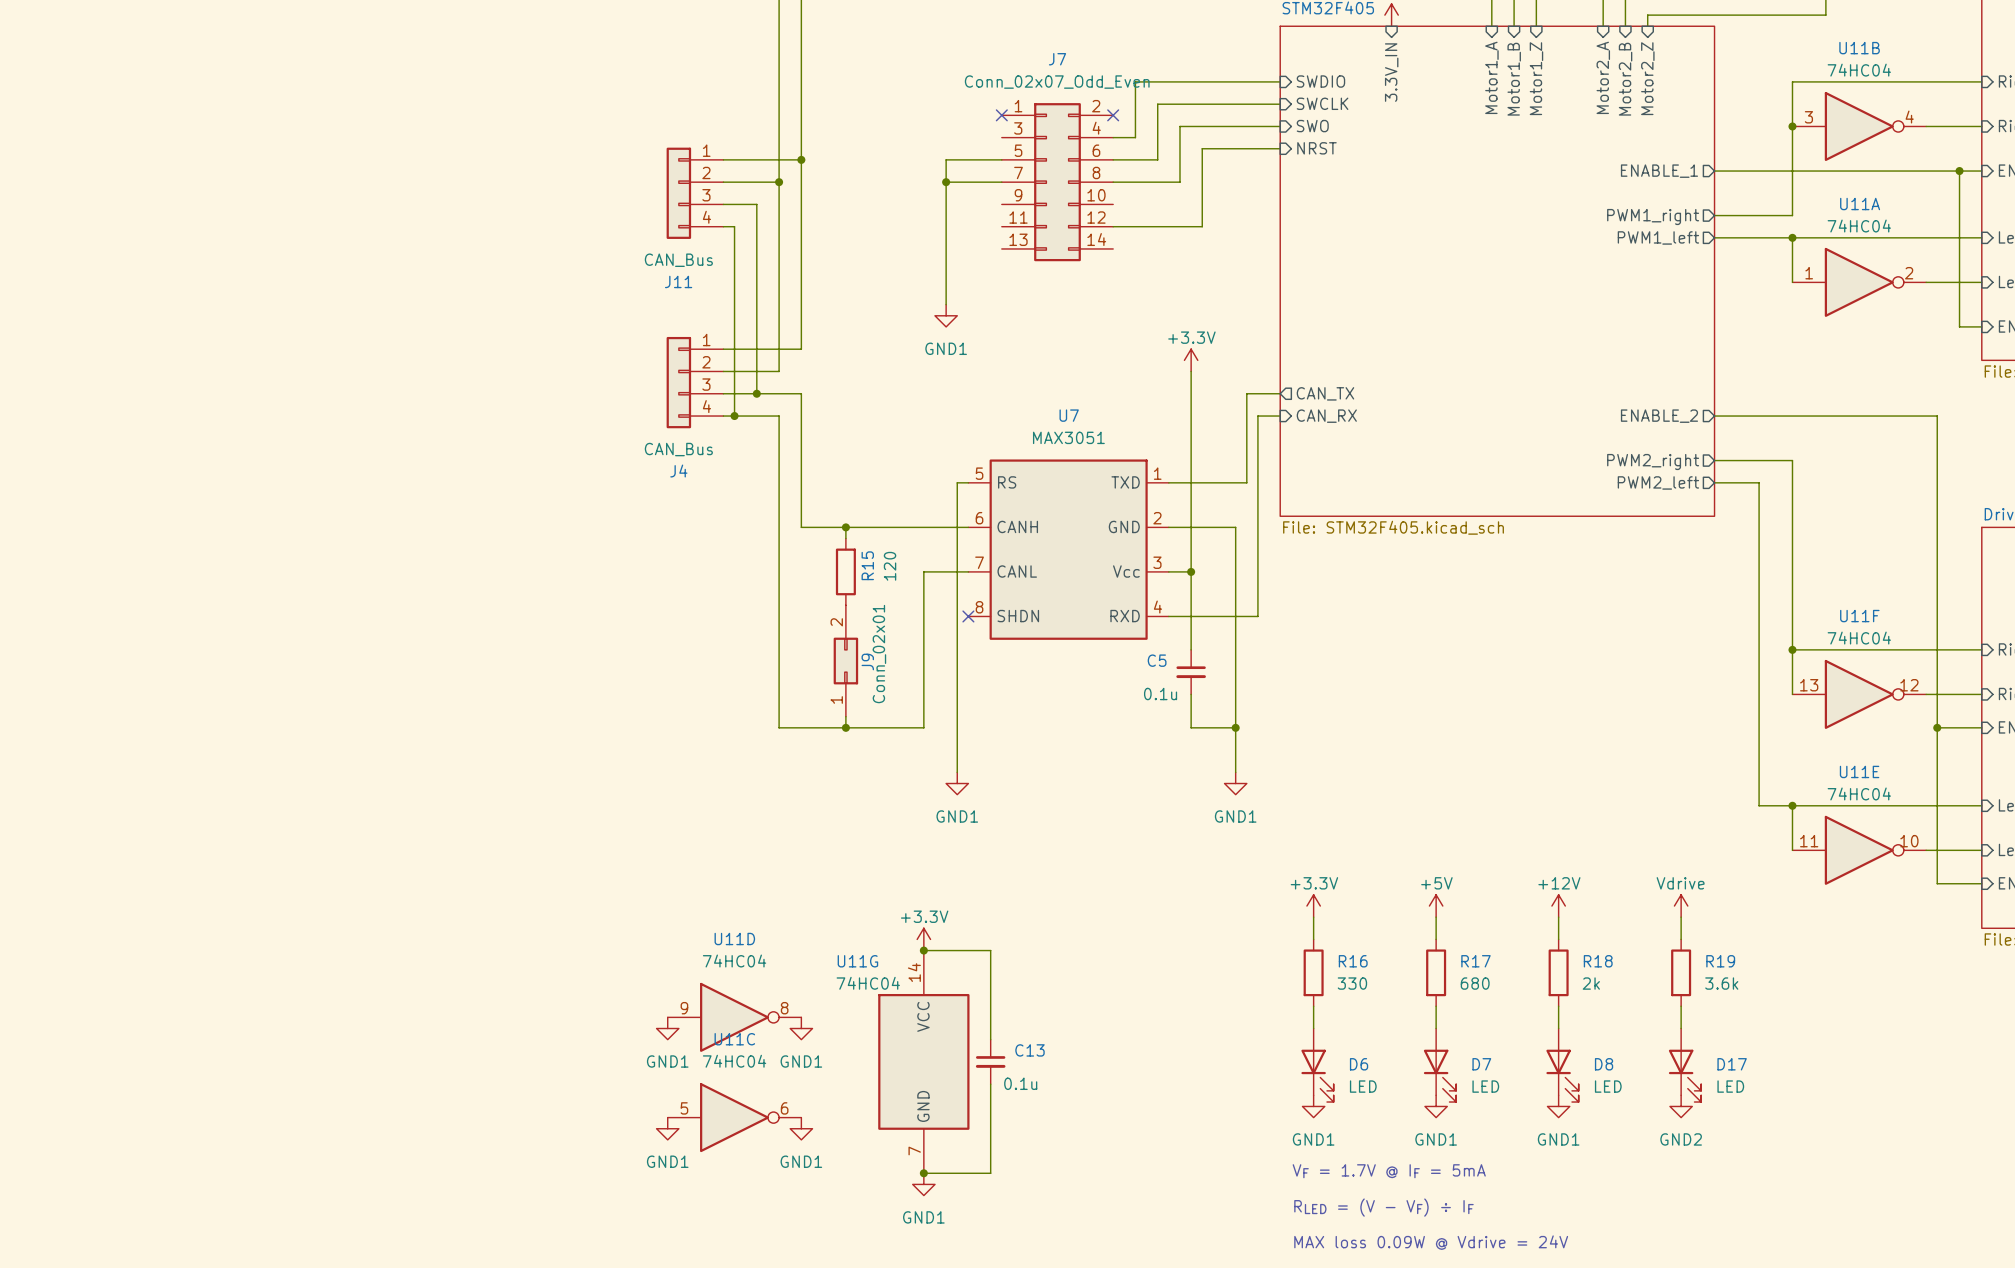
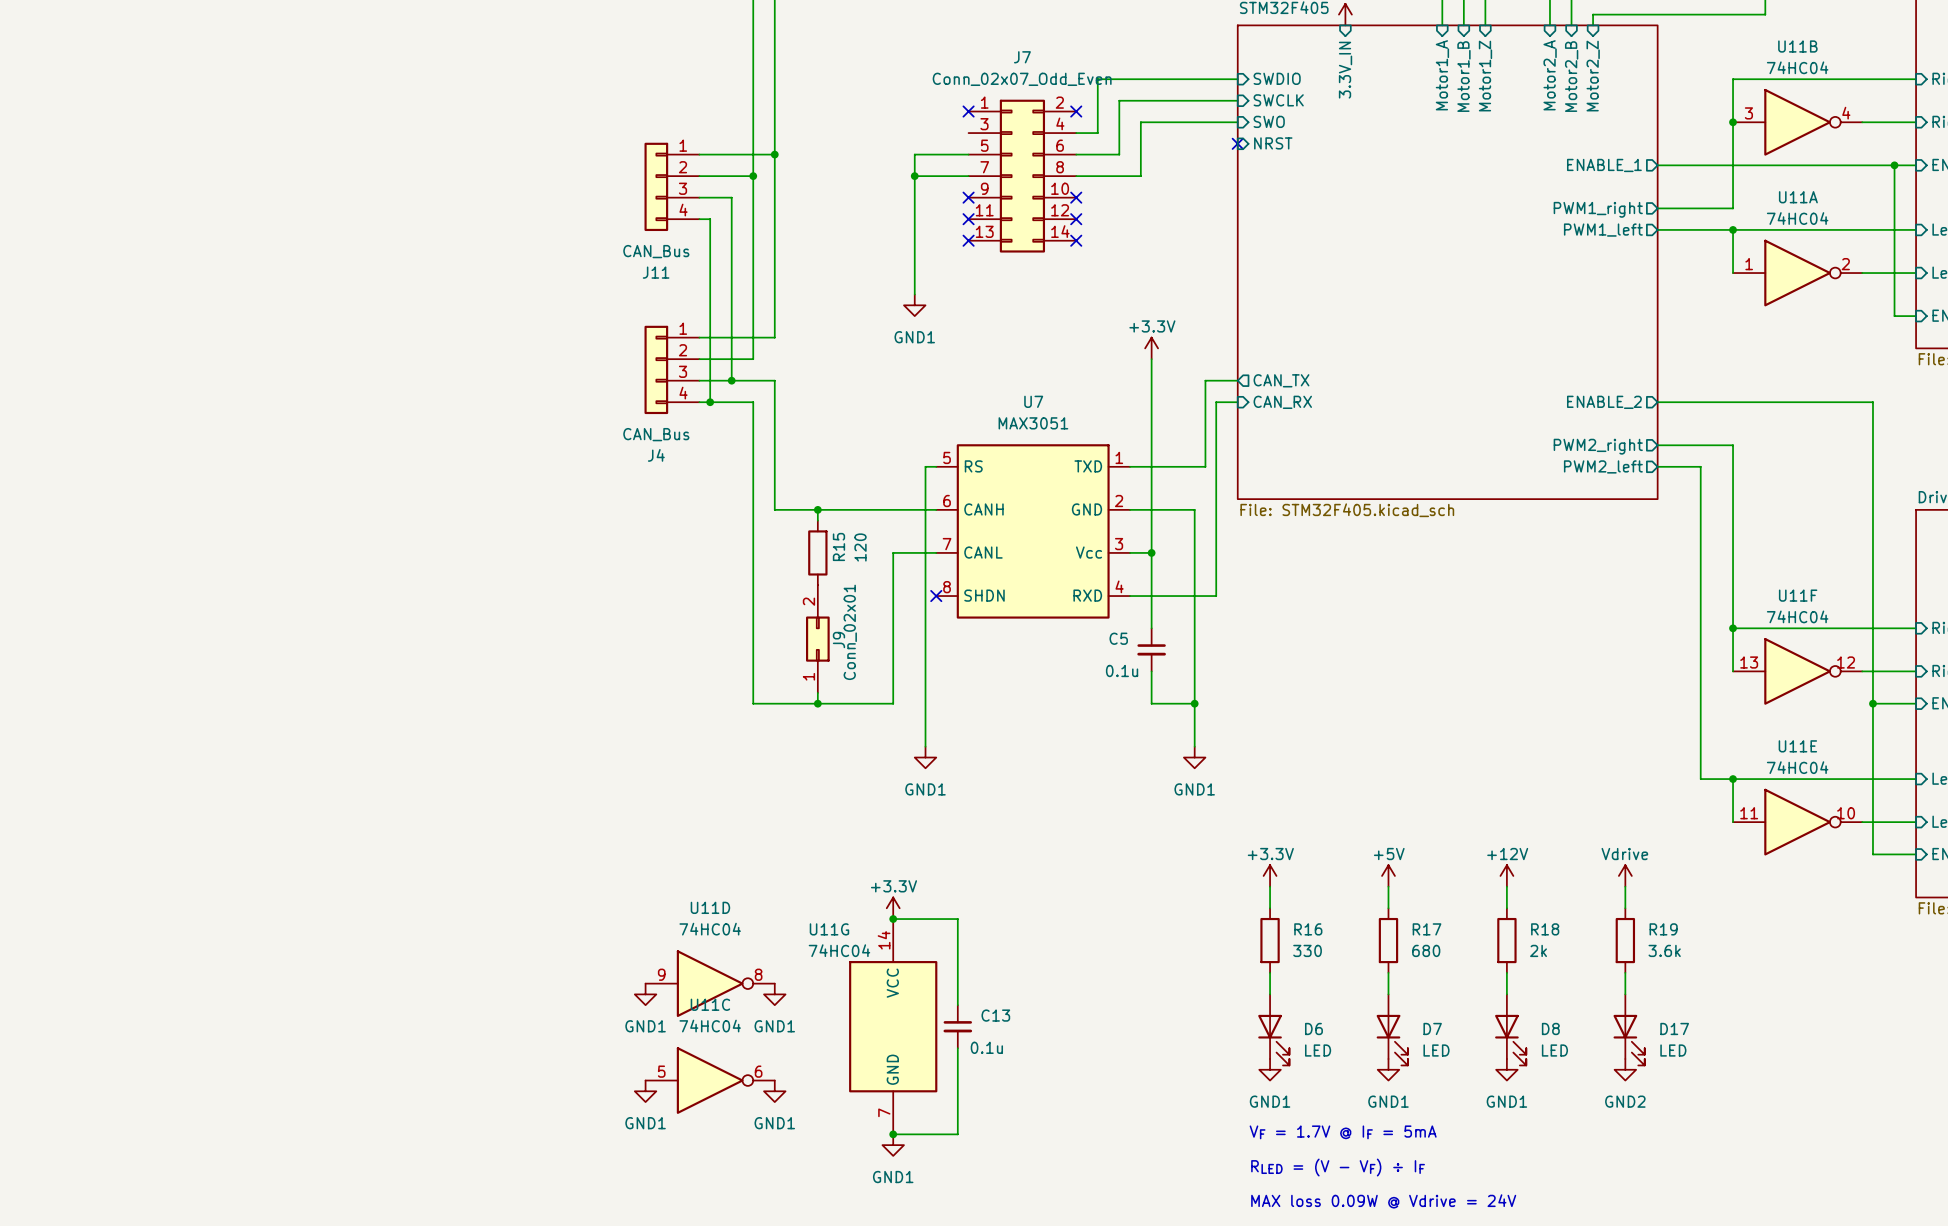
wire: (1280, 148) (1202, 148) (1202, 226) (1113, 226) -> none
no-connect mark: none -> (1237, 143)
no-connect mark: none -> (968, 197)
no-connect mark: none -> (1076, 197)
no-connect mark: none -> (968, 219)
no-connect mark: none -> (1076, 219)
no-connect mark: none -> (968, 240)
no-connect mark: none -> (1076, 240)

